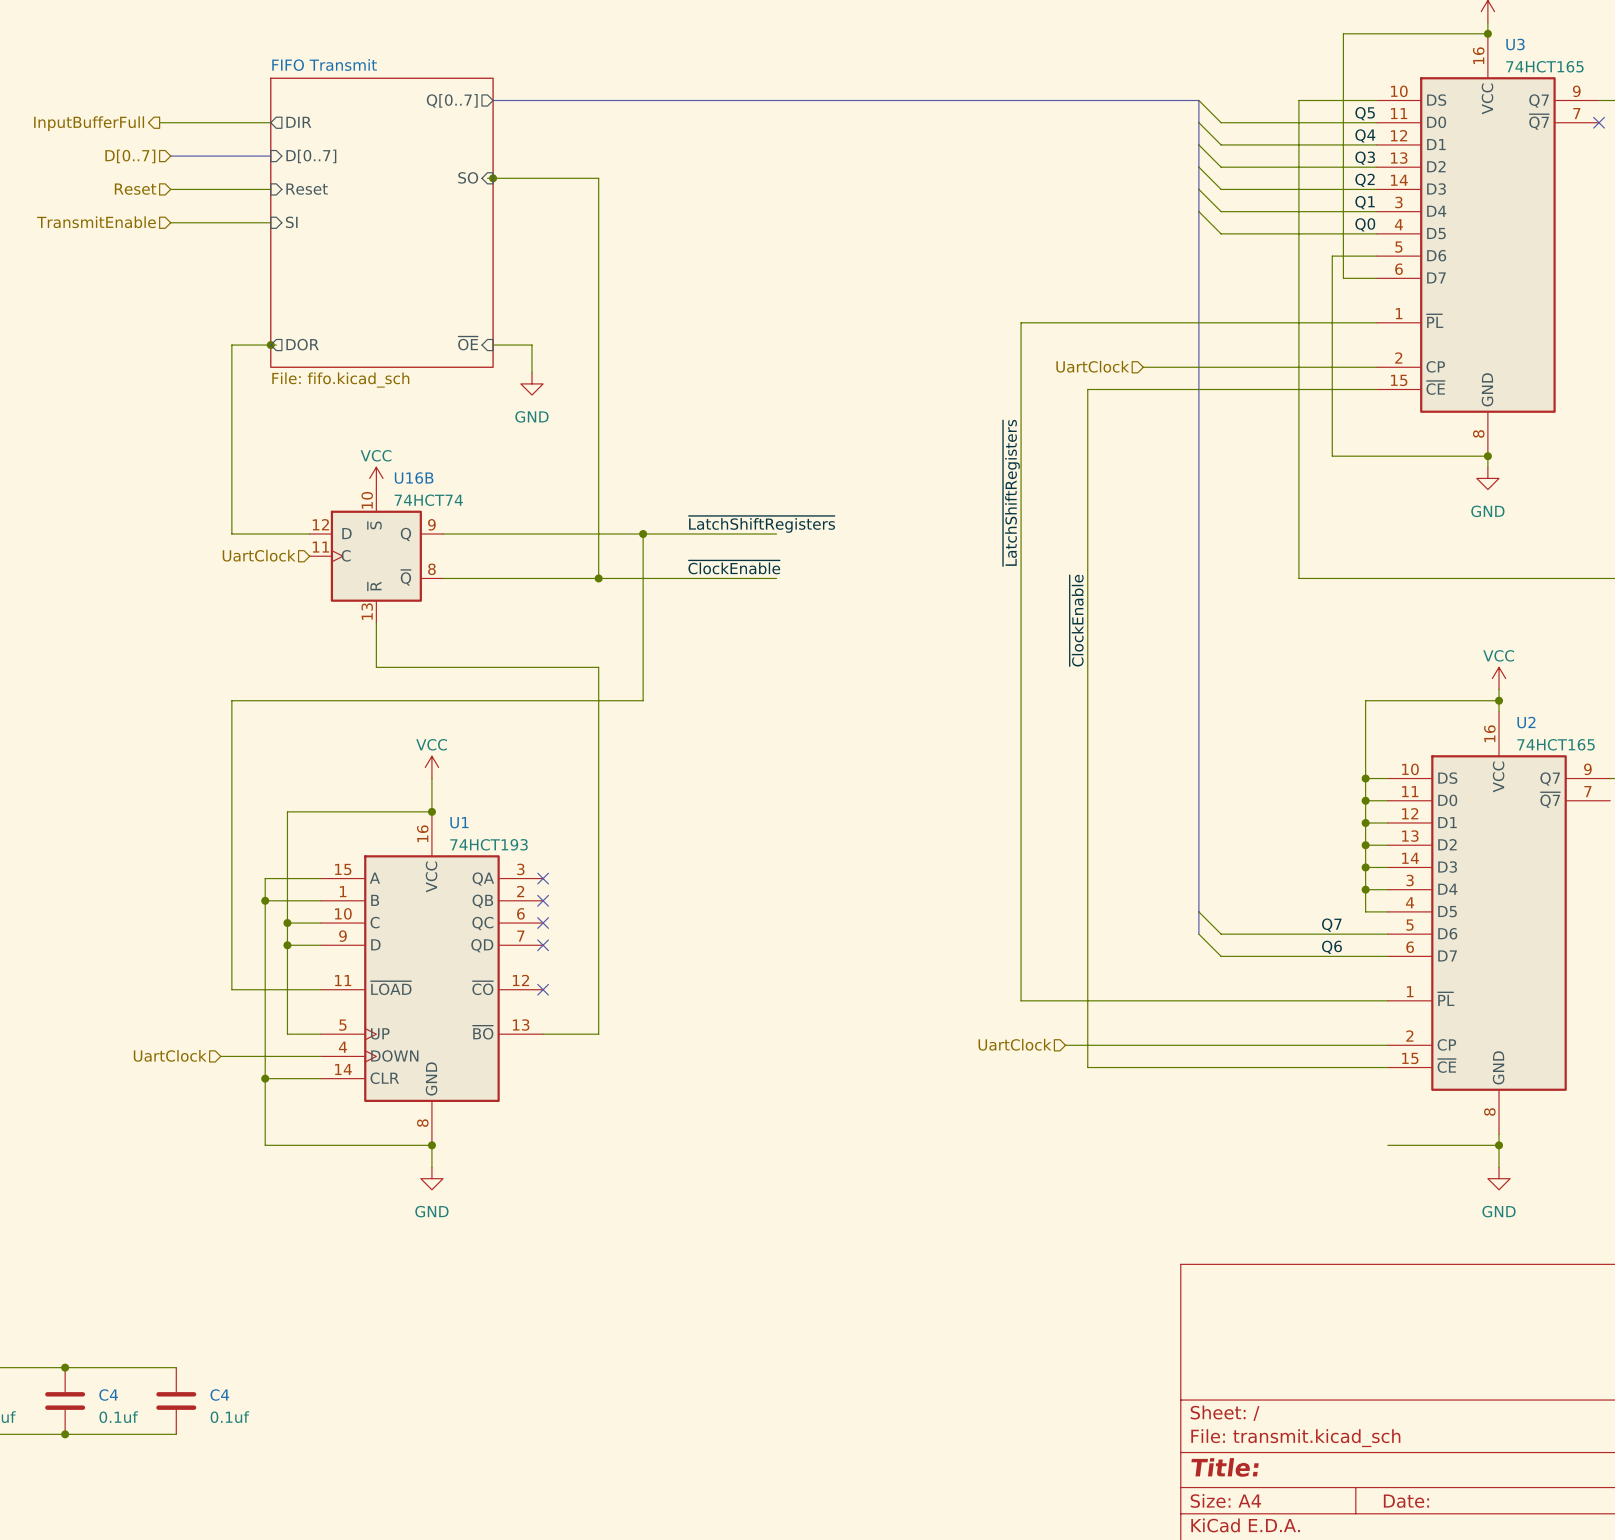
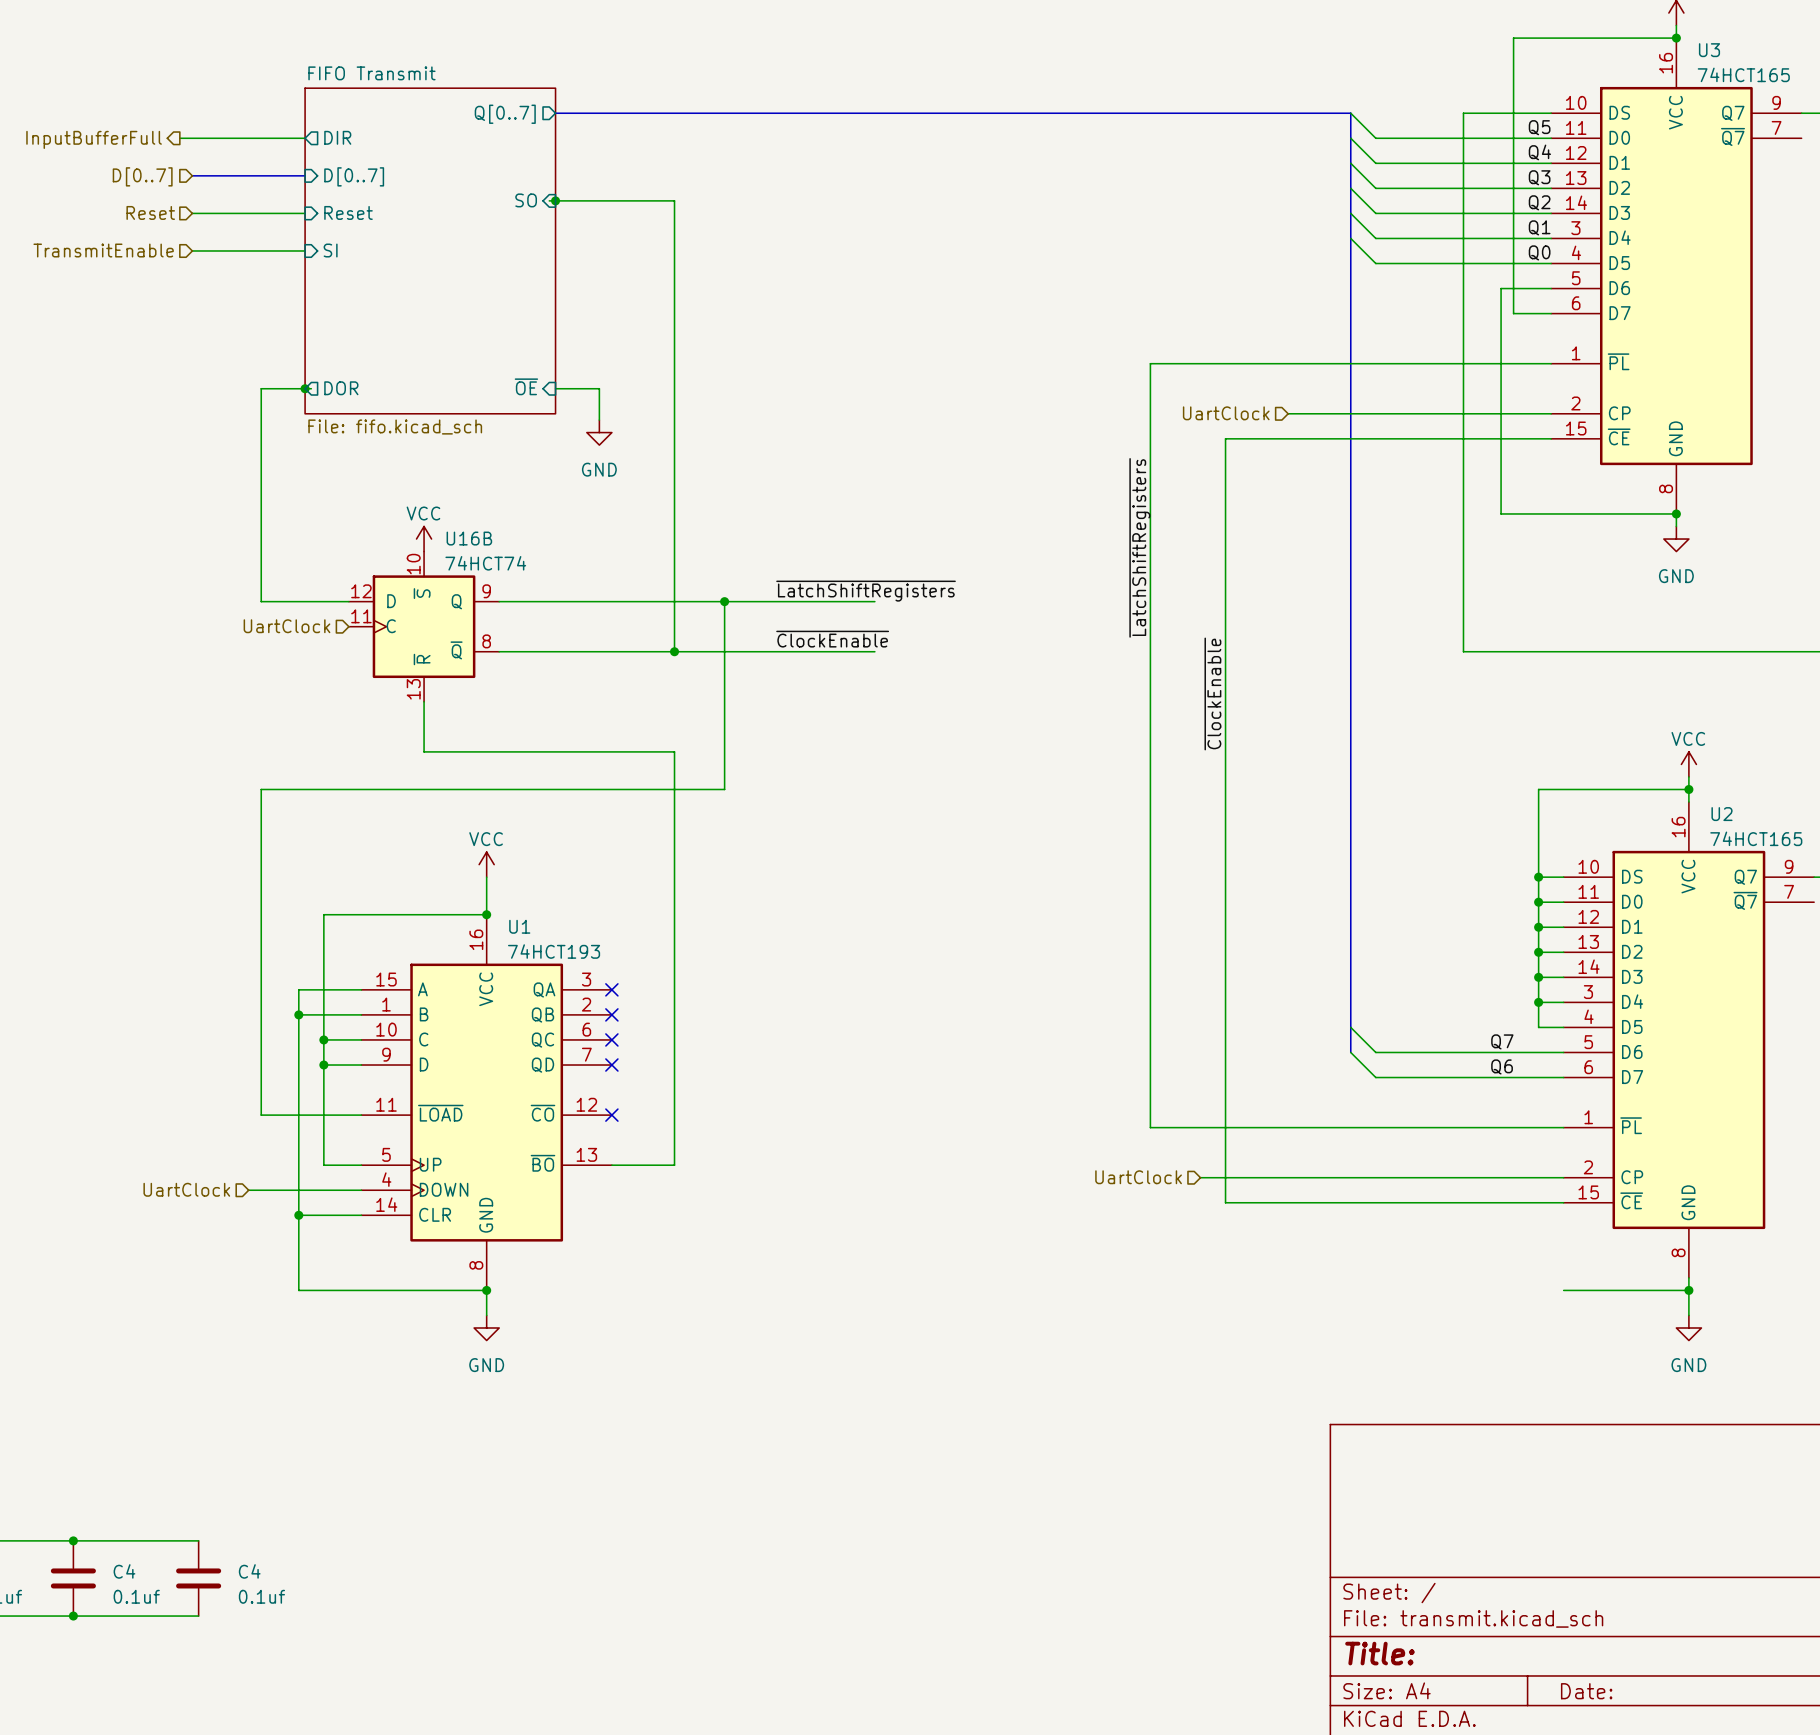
no-connect mark: (1599, 122) -> none

